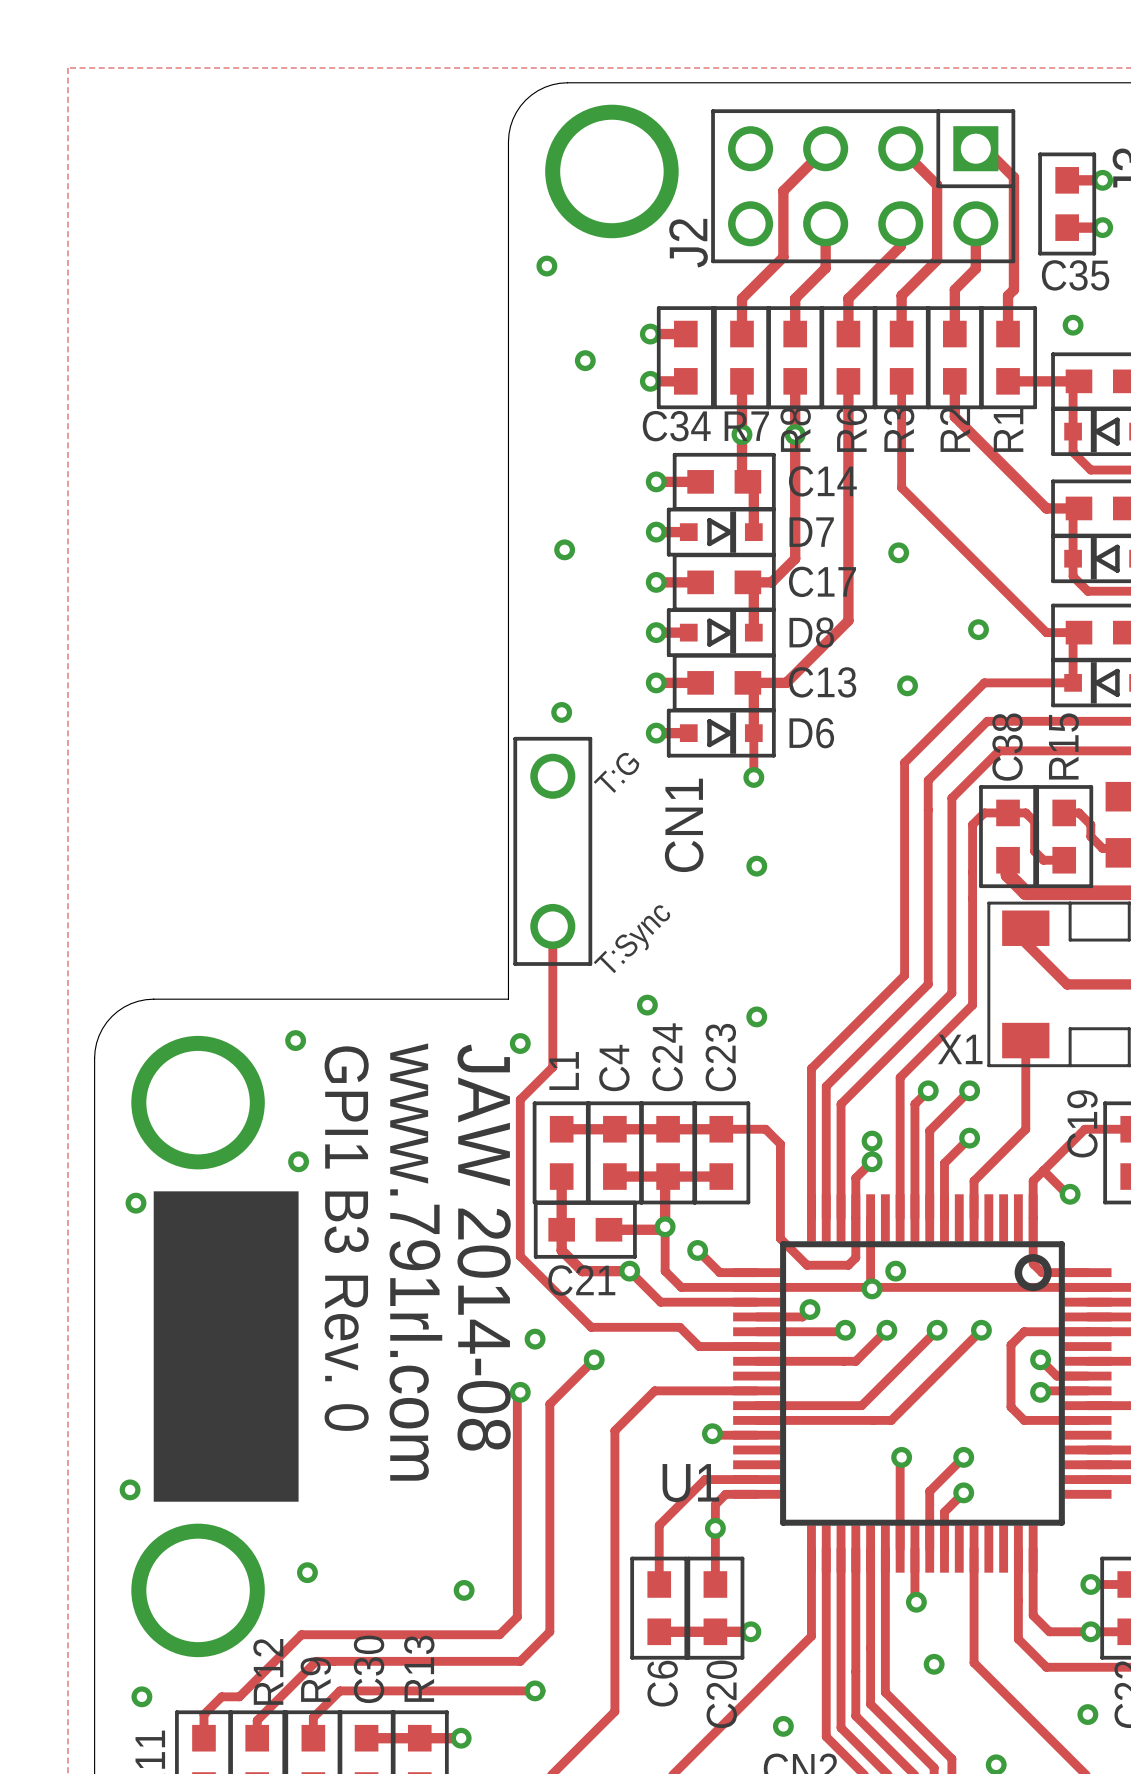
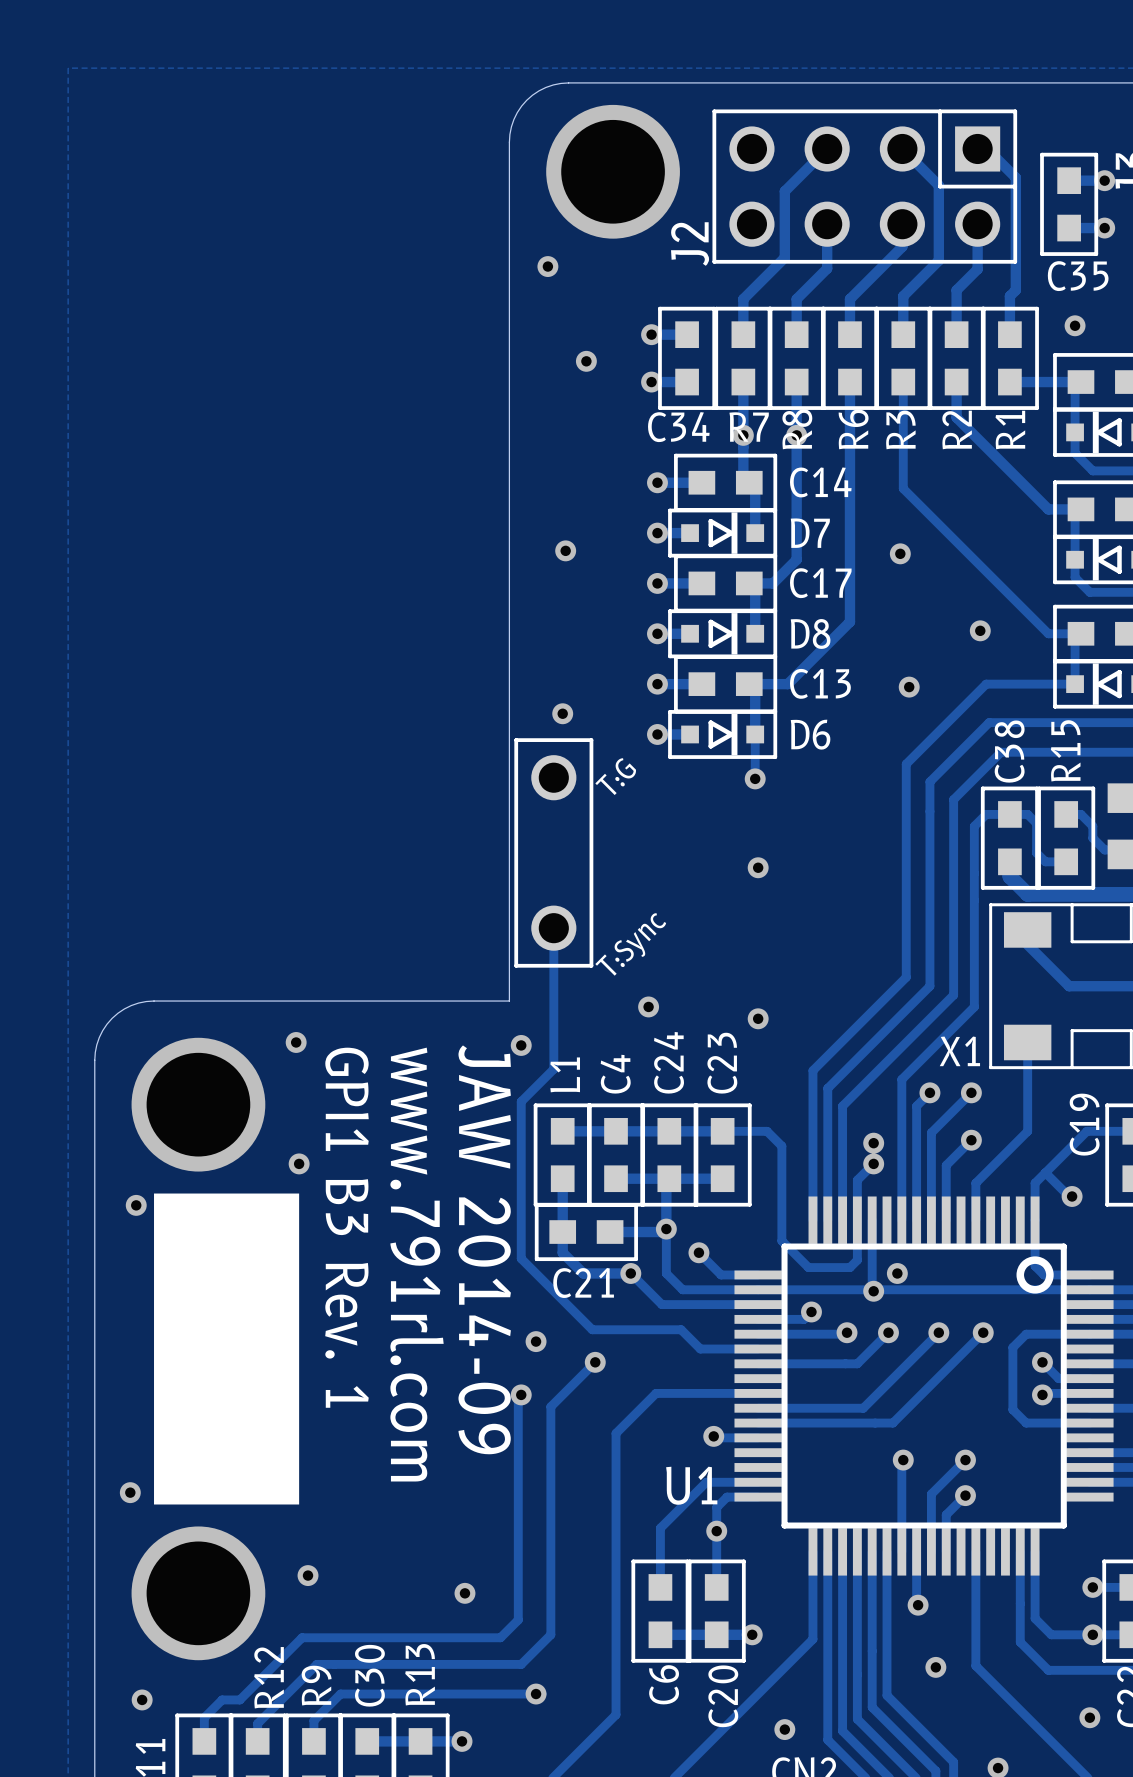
CN1 name: CN1 (684, 825) -> none
text: GPI1 B3 Rev. 0 (346, 1238) -> GPI1 B3 Rev. 1 (346, 1227)
text: JAW 2014-08 (484, 1247) -> JAW 2014-09 (484, 1249)

